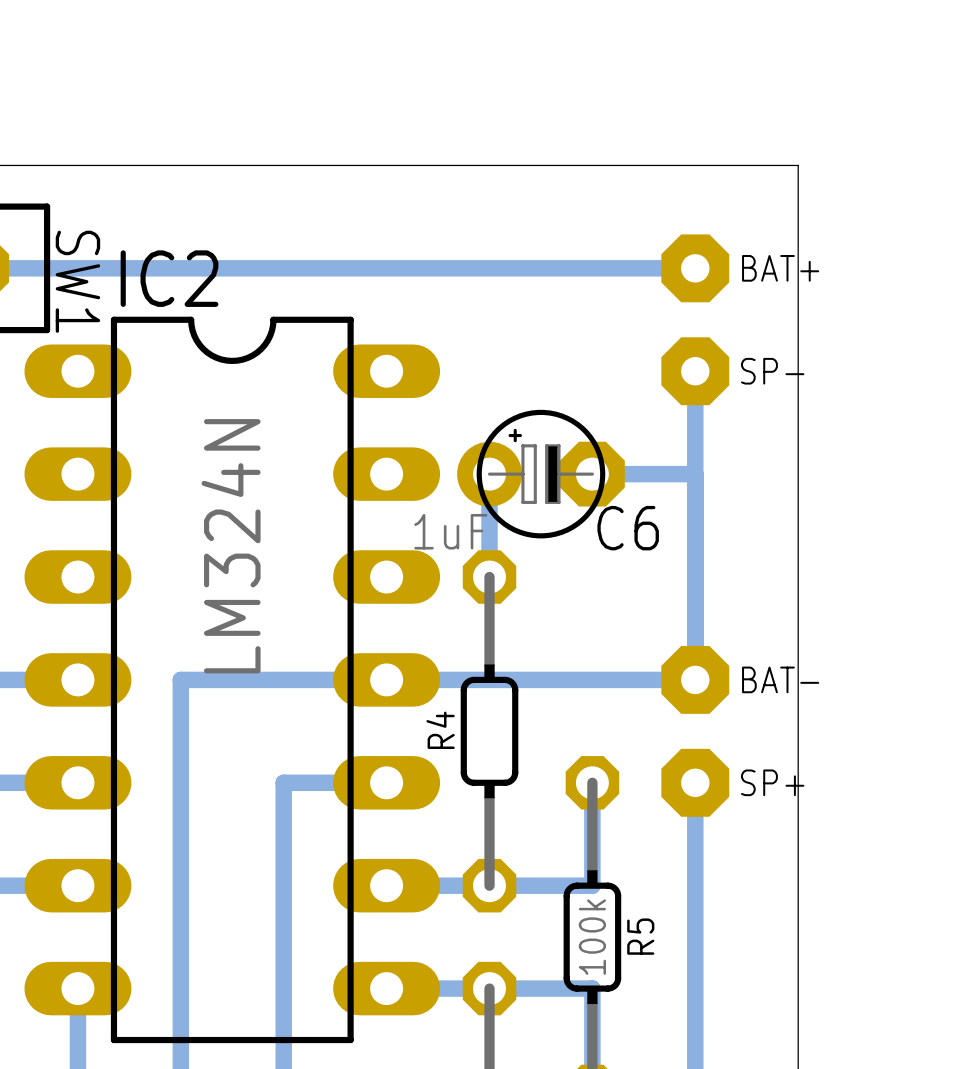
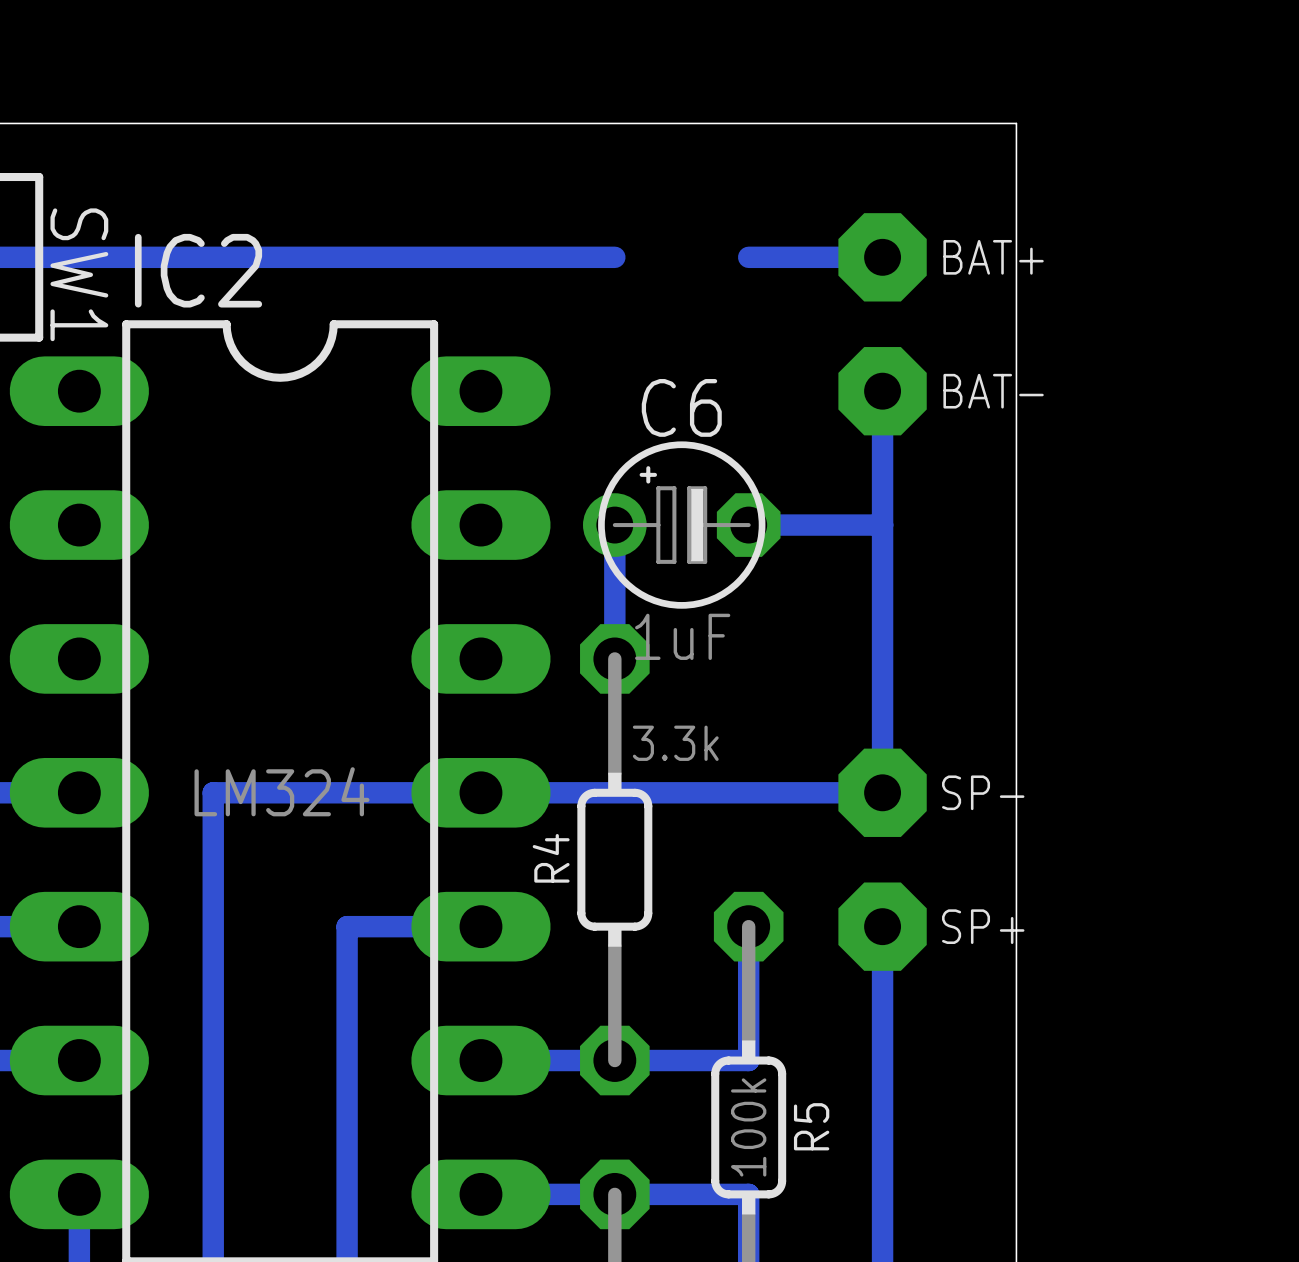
bottom track: (489, 268) (592, 268) -> none
SP- name: SP- (772, 371) -> BAT- (993, 391)
C6 footprint: [457, 409, 625, 539] -> [583, 441, 781, 609]
C6 name position: C6 (628, 528) -> C6 (681, 407)
C6 value position: 1uF (450, 531) -> 1uF (682, 636)
IC2 value: LM324N (231, 546) -> LM324 (282, 791)
R4 value: none -> 3.3k (675, 743)
BAT- name: BAT- (780, 679) -> SP- (983, 792)

